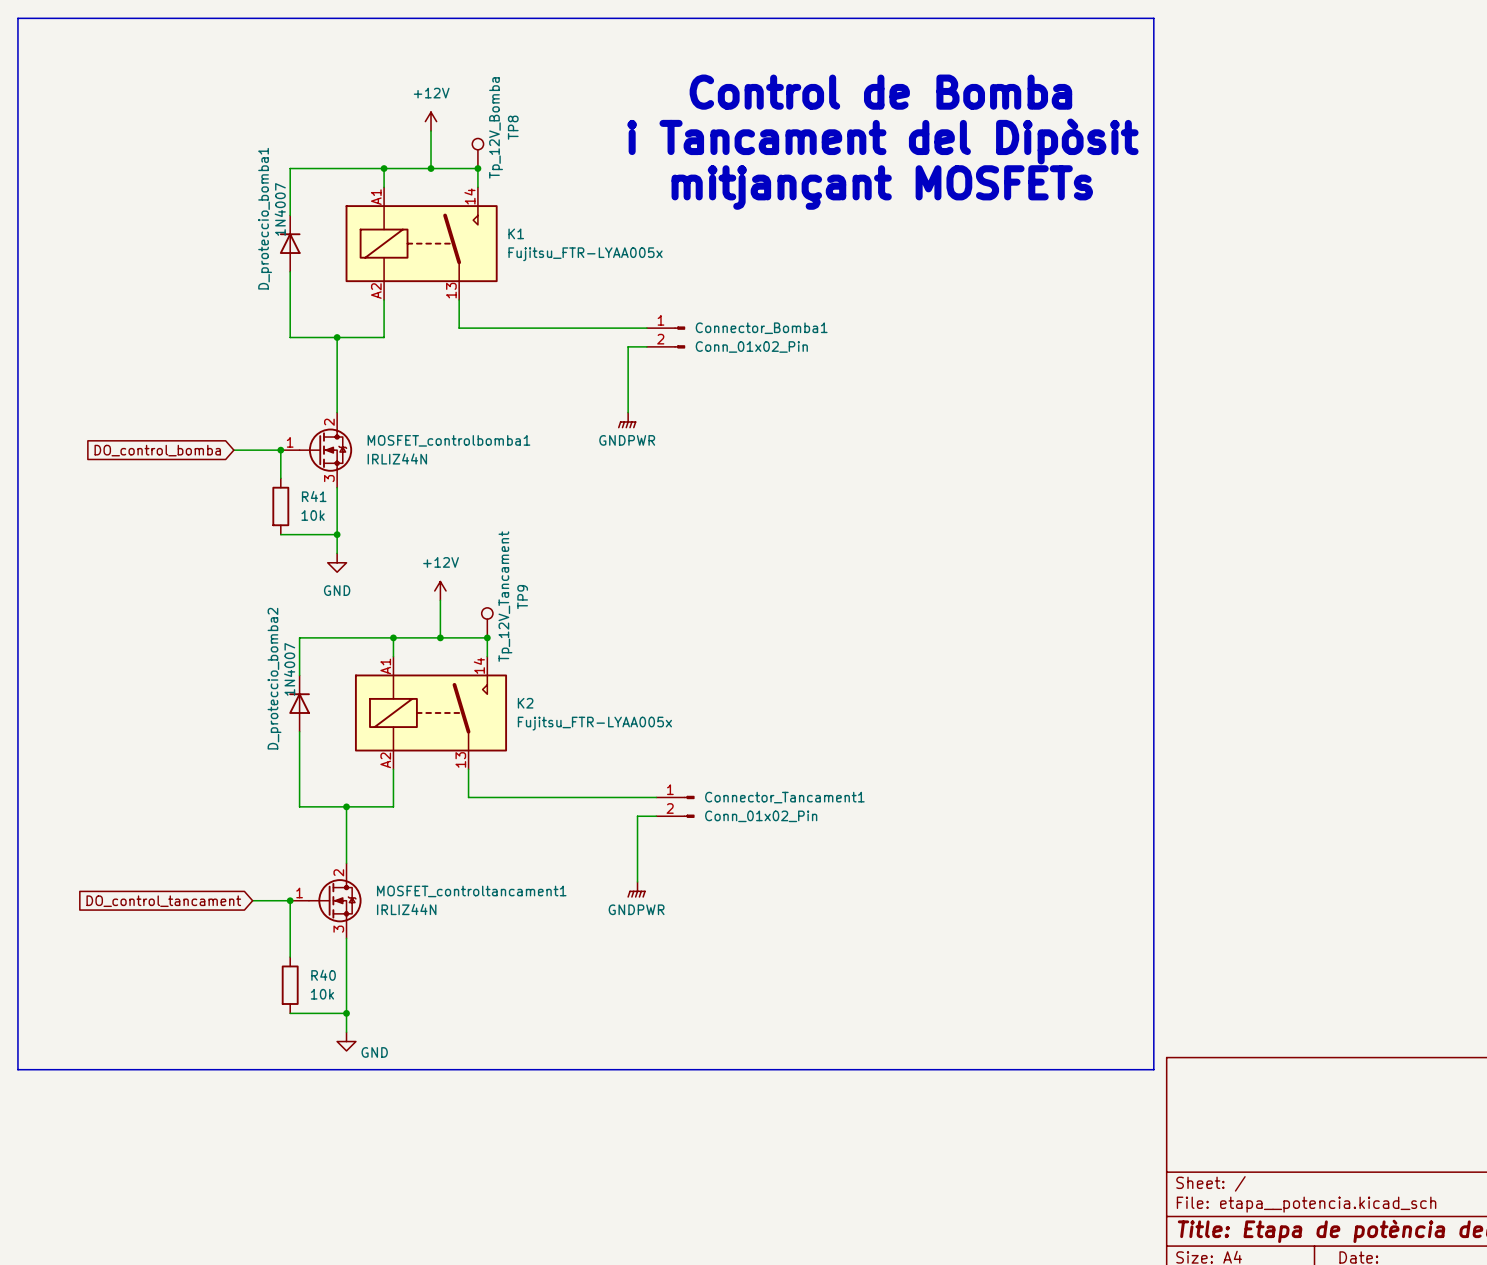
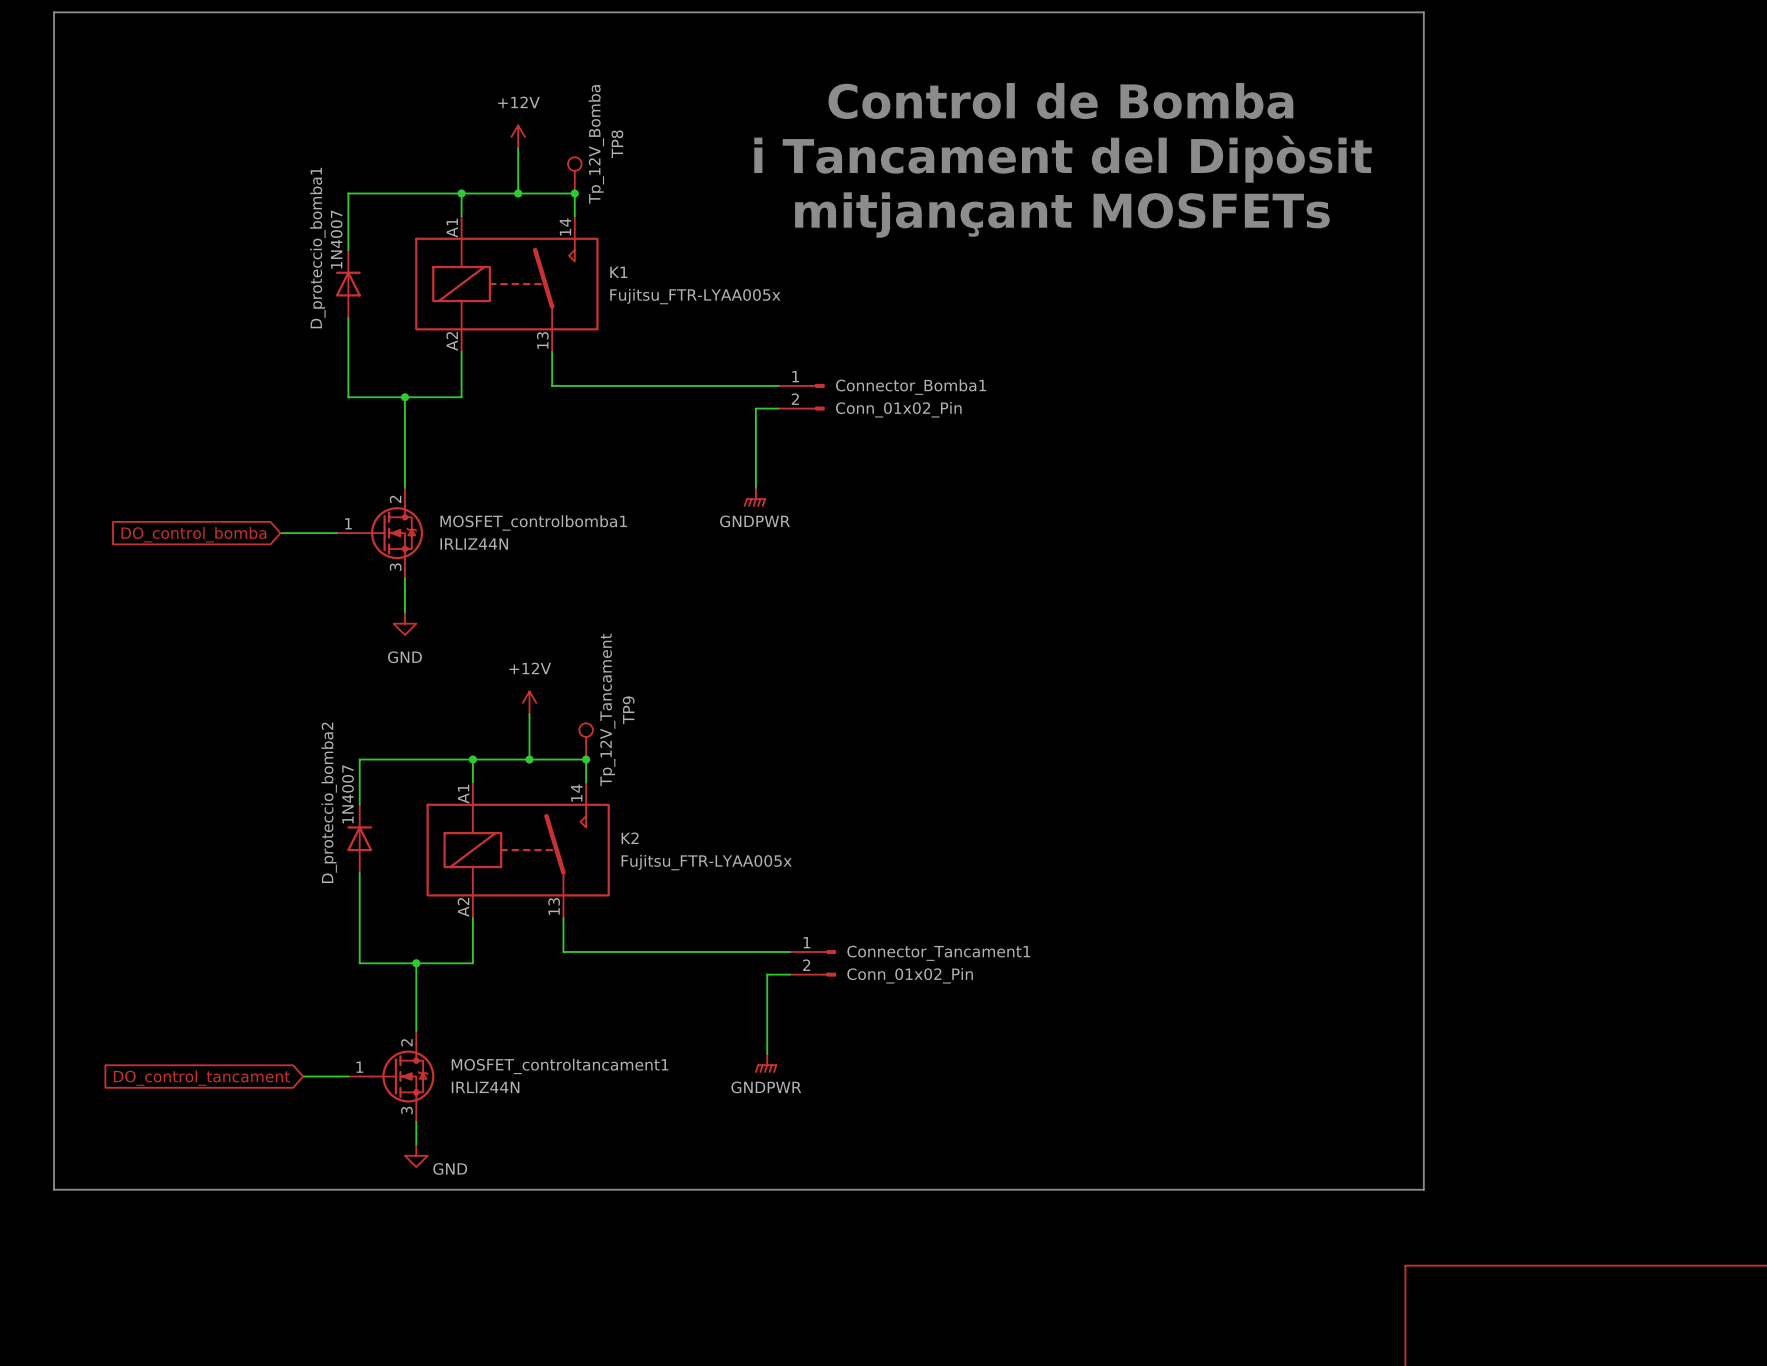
bus: (46, 18) (17, 18) (17, 1069) (1153, 1069) (1153, 18) -> (54, 12) (54, 1189) (1423, 1189) (1423, 12) (1389, 12)
wire: (280, 450) (280, 478) -> none
junction: (280, 450) -> none
R41: 10k (280, 506) -> none
wire: (337, 515) (337, 553) -> none
wire: (280, 534) (337, 534) -> none
junction: (337, 534) -> none
power symbol position: GND (337, 562) -> GND (404, 623)
wire: (290, 900) (290, 957) -> none
junction: (290, 900) -> none
wire: (346, 957) (346, 1032) -> none
R40: 10k (290, 985) -> none
wire: (290, 1013) (346, 1013) -> none
junction: (346, 1013) -> none
power symbol position: GND (346, 1041) -> GND (416, 1155)

